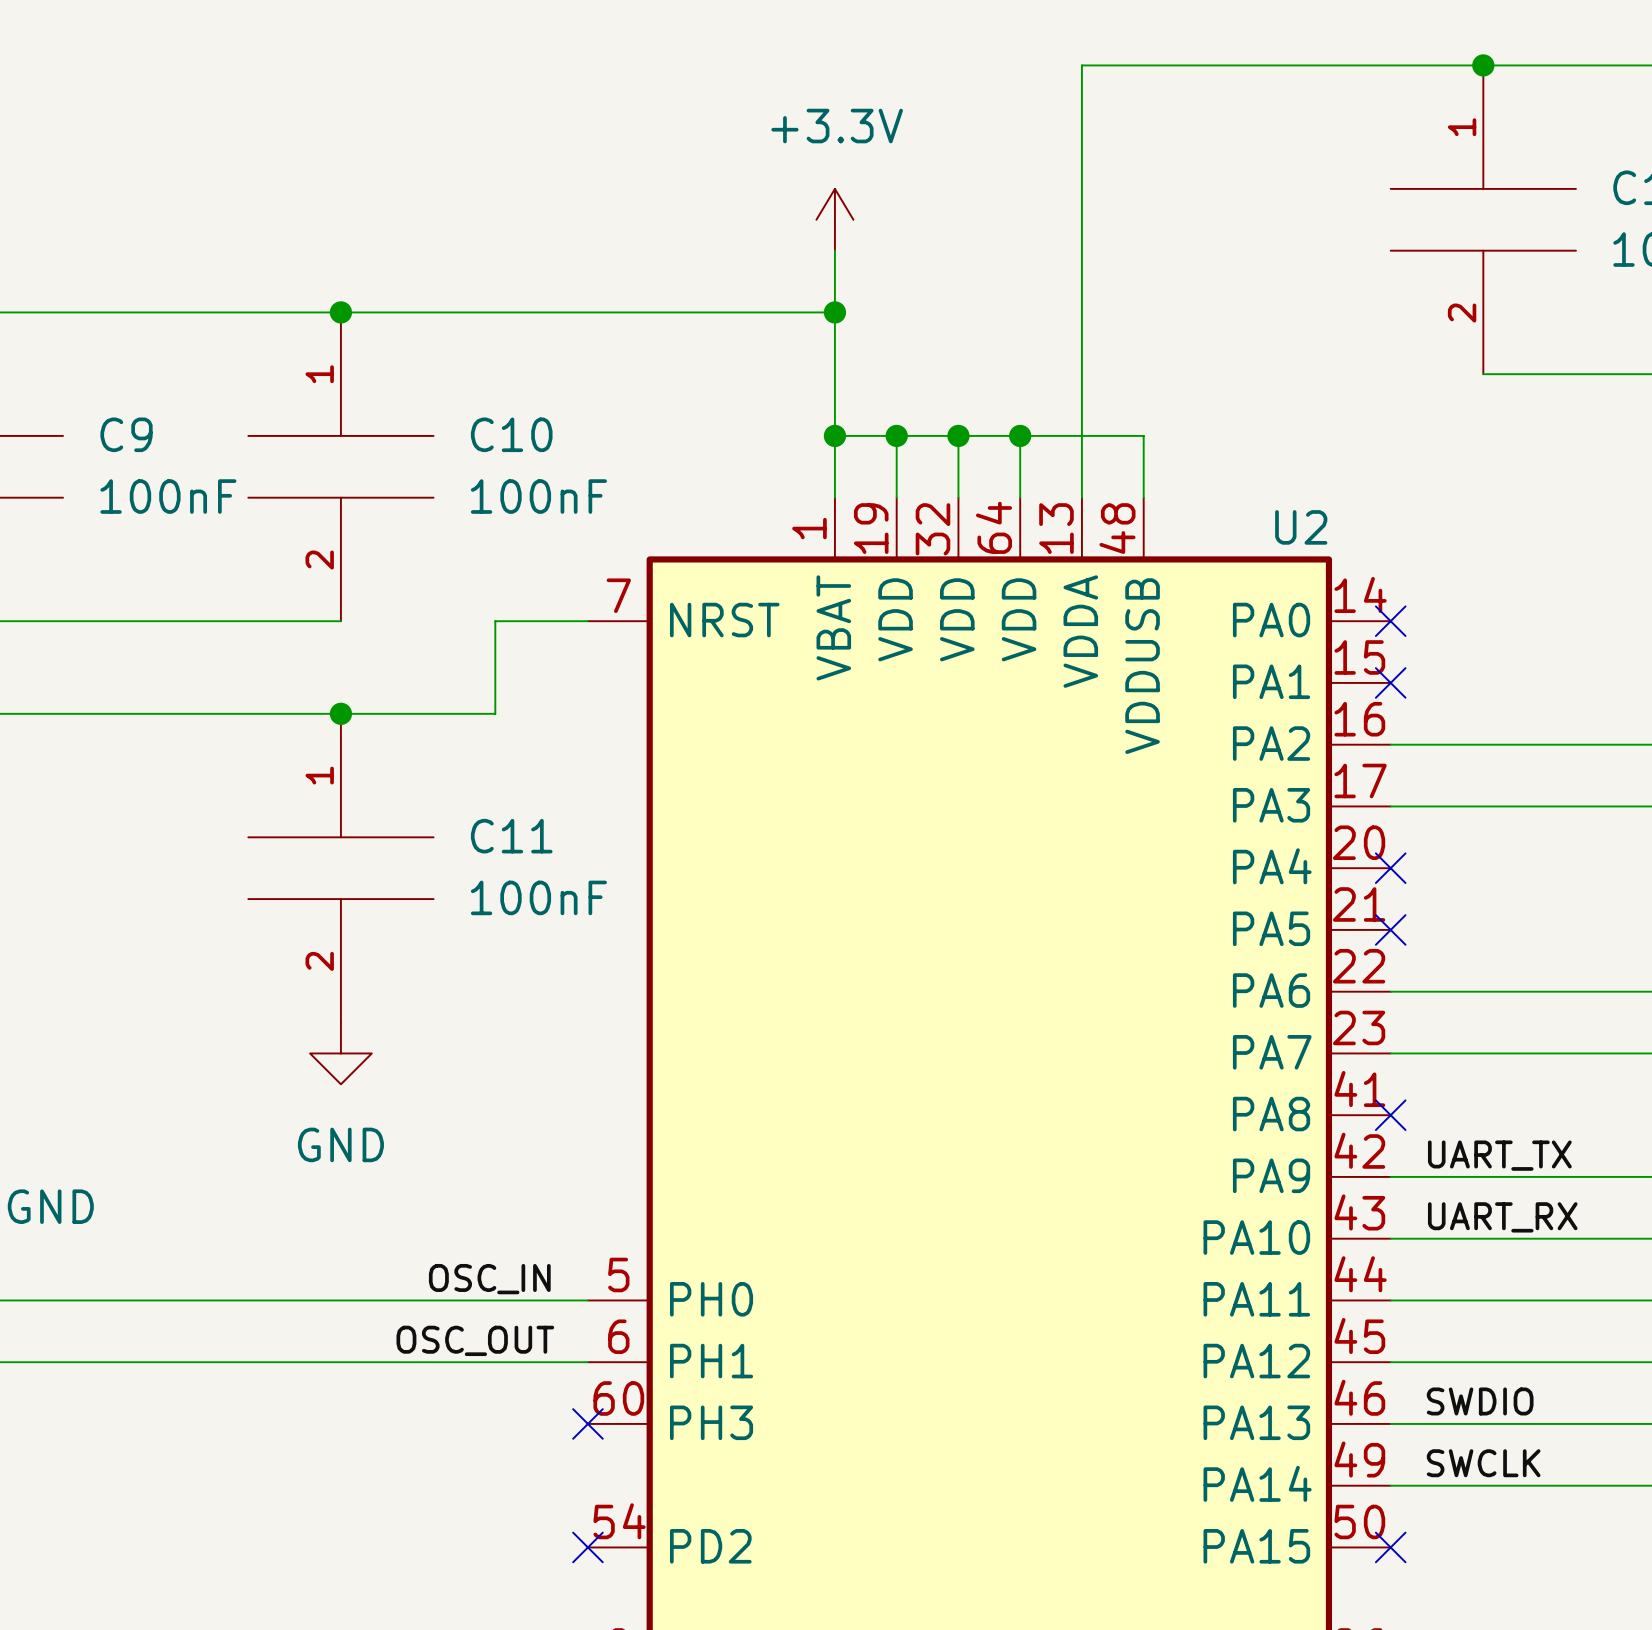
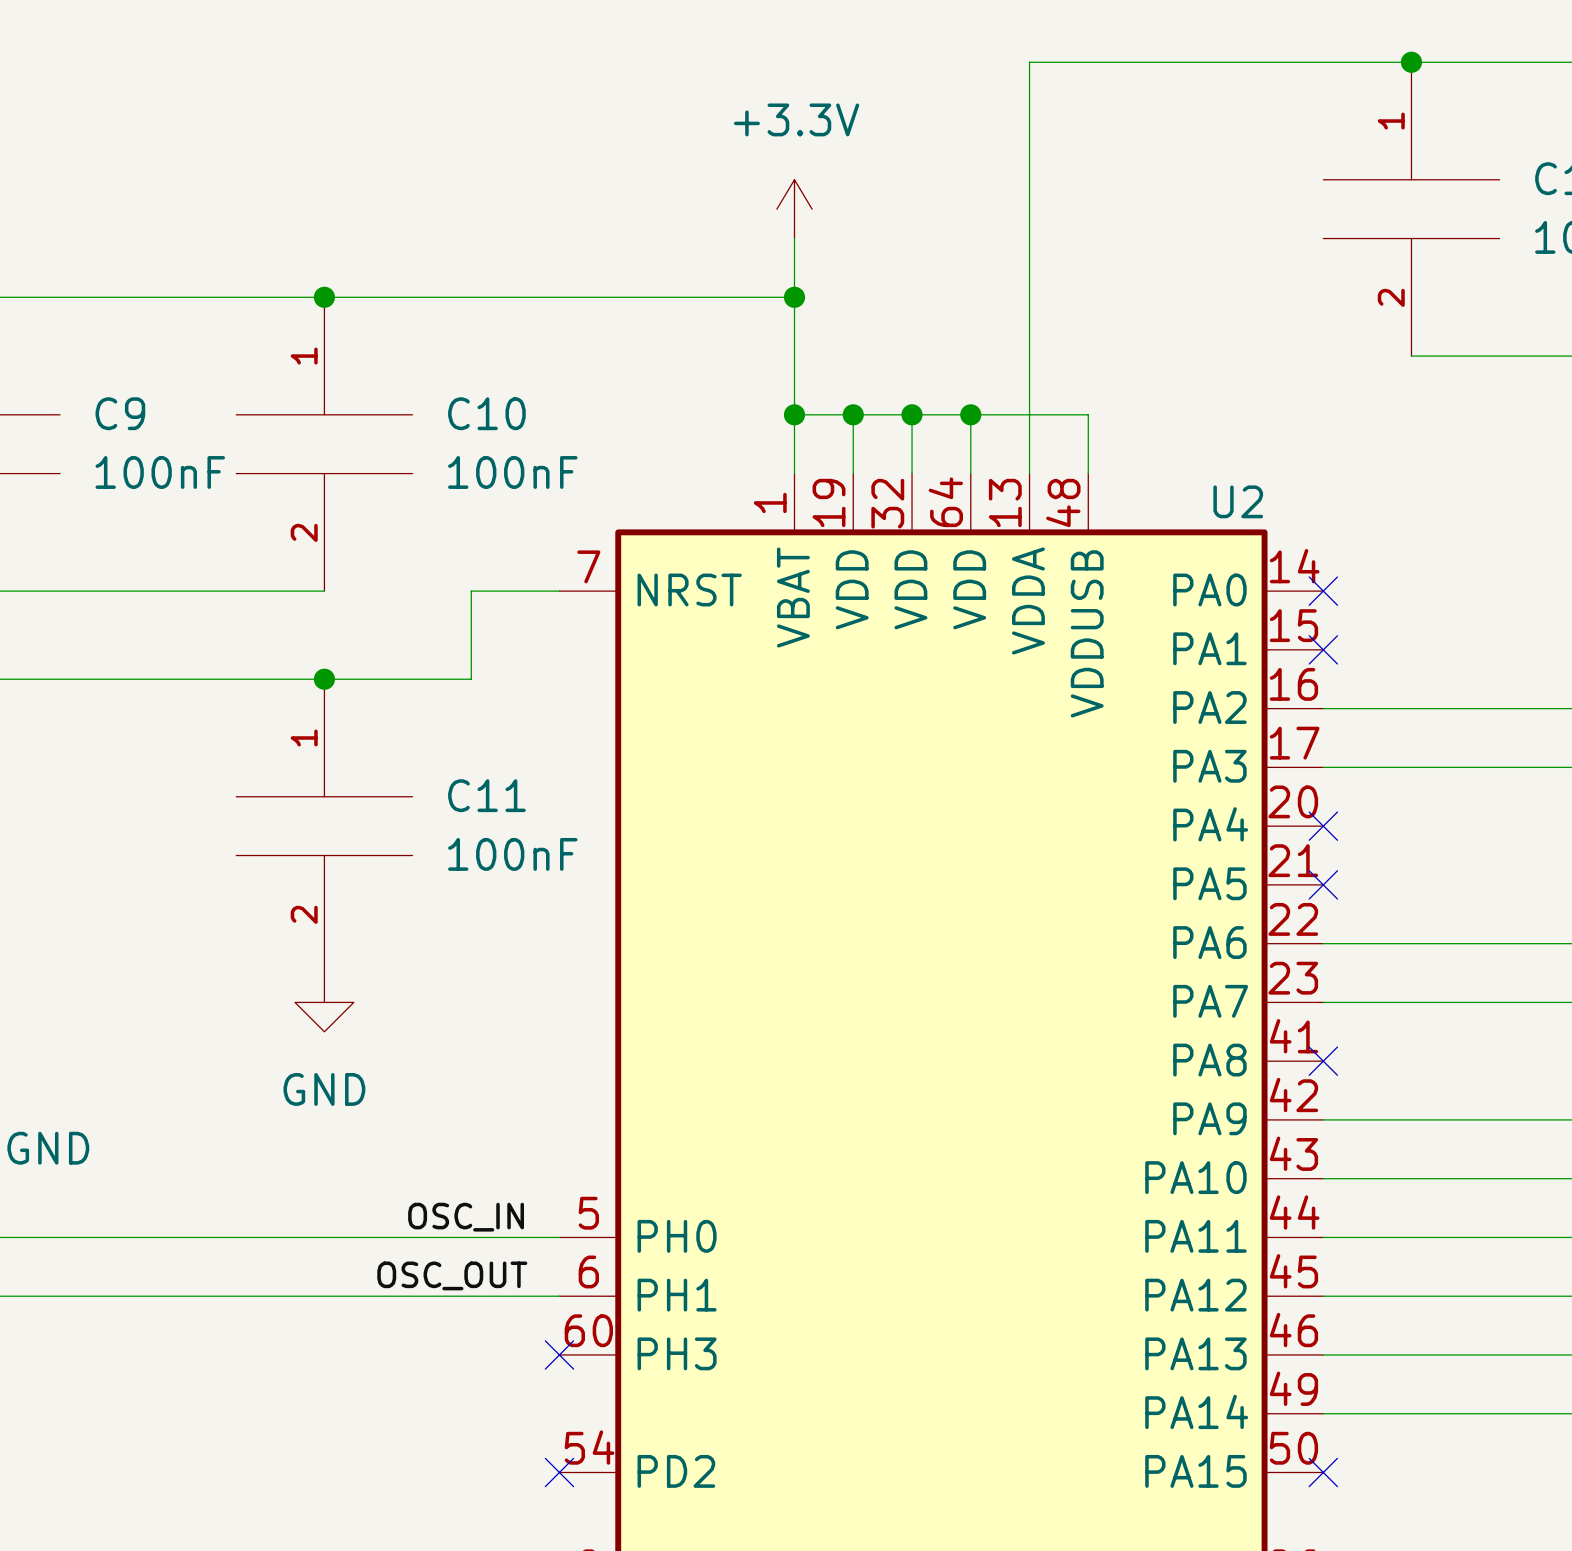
label: UART_TX (1499, 1155) -> none
label: UART_RX (1502, 1217) -> none
label: SWDIO (1480, 1401) -> none
label: SWCLK (1483, 1463) -> none

